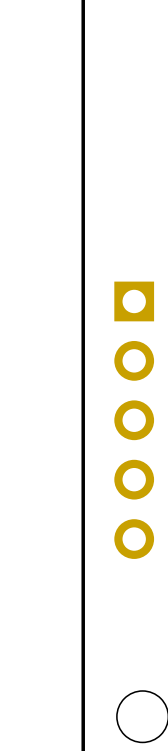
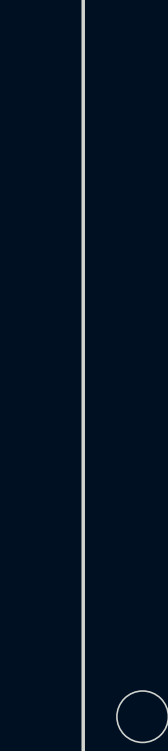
part: (134, 420) -> none

